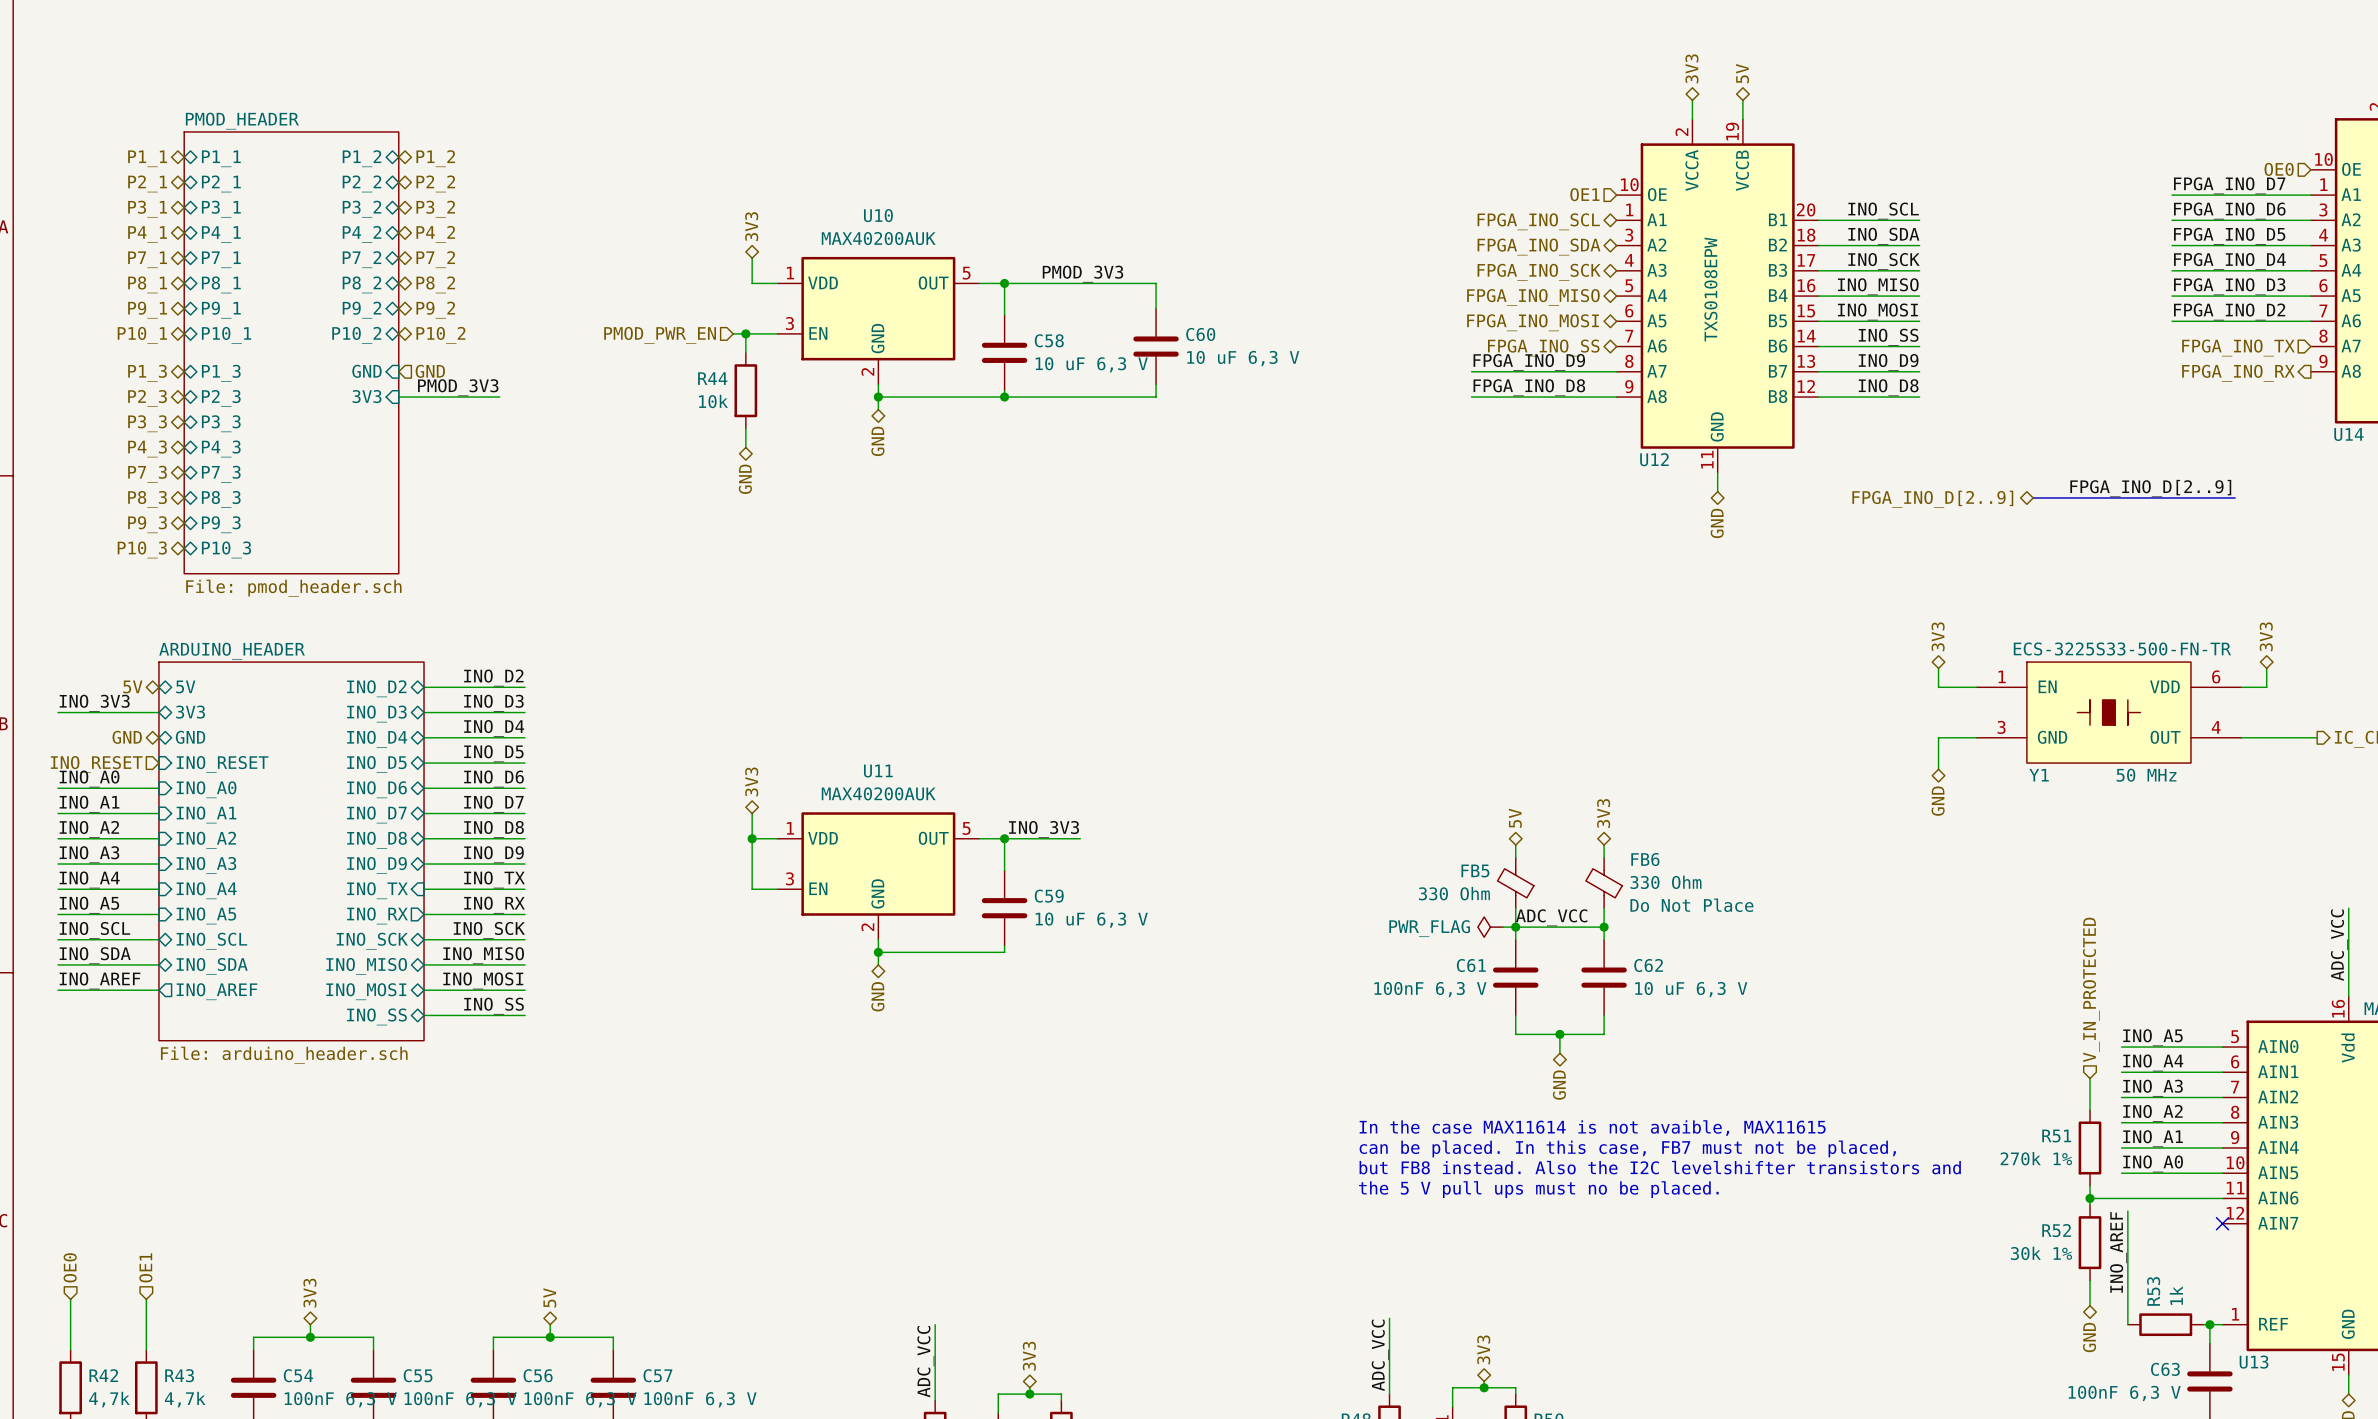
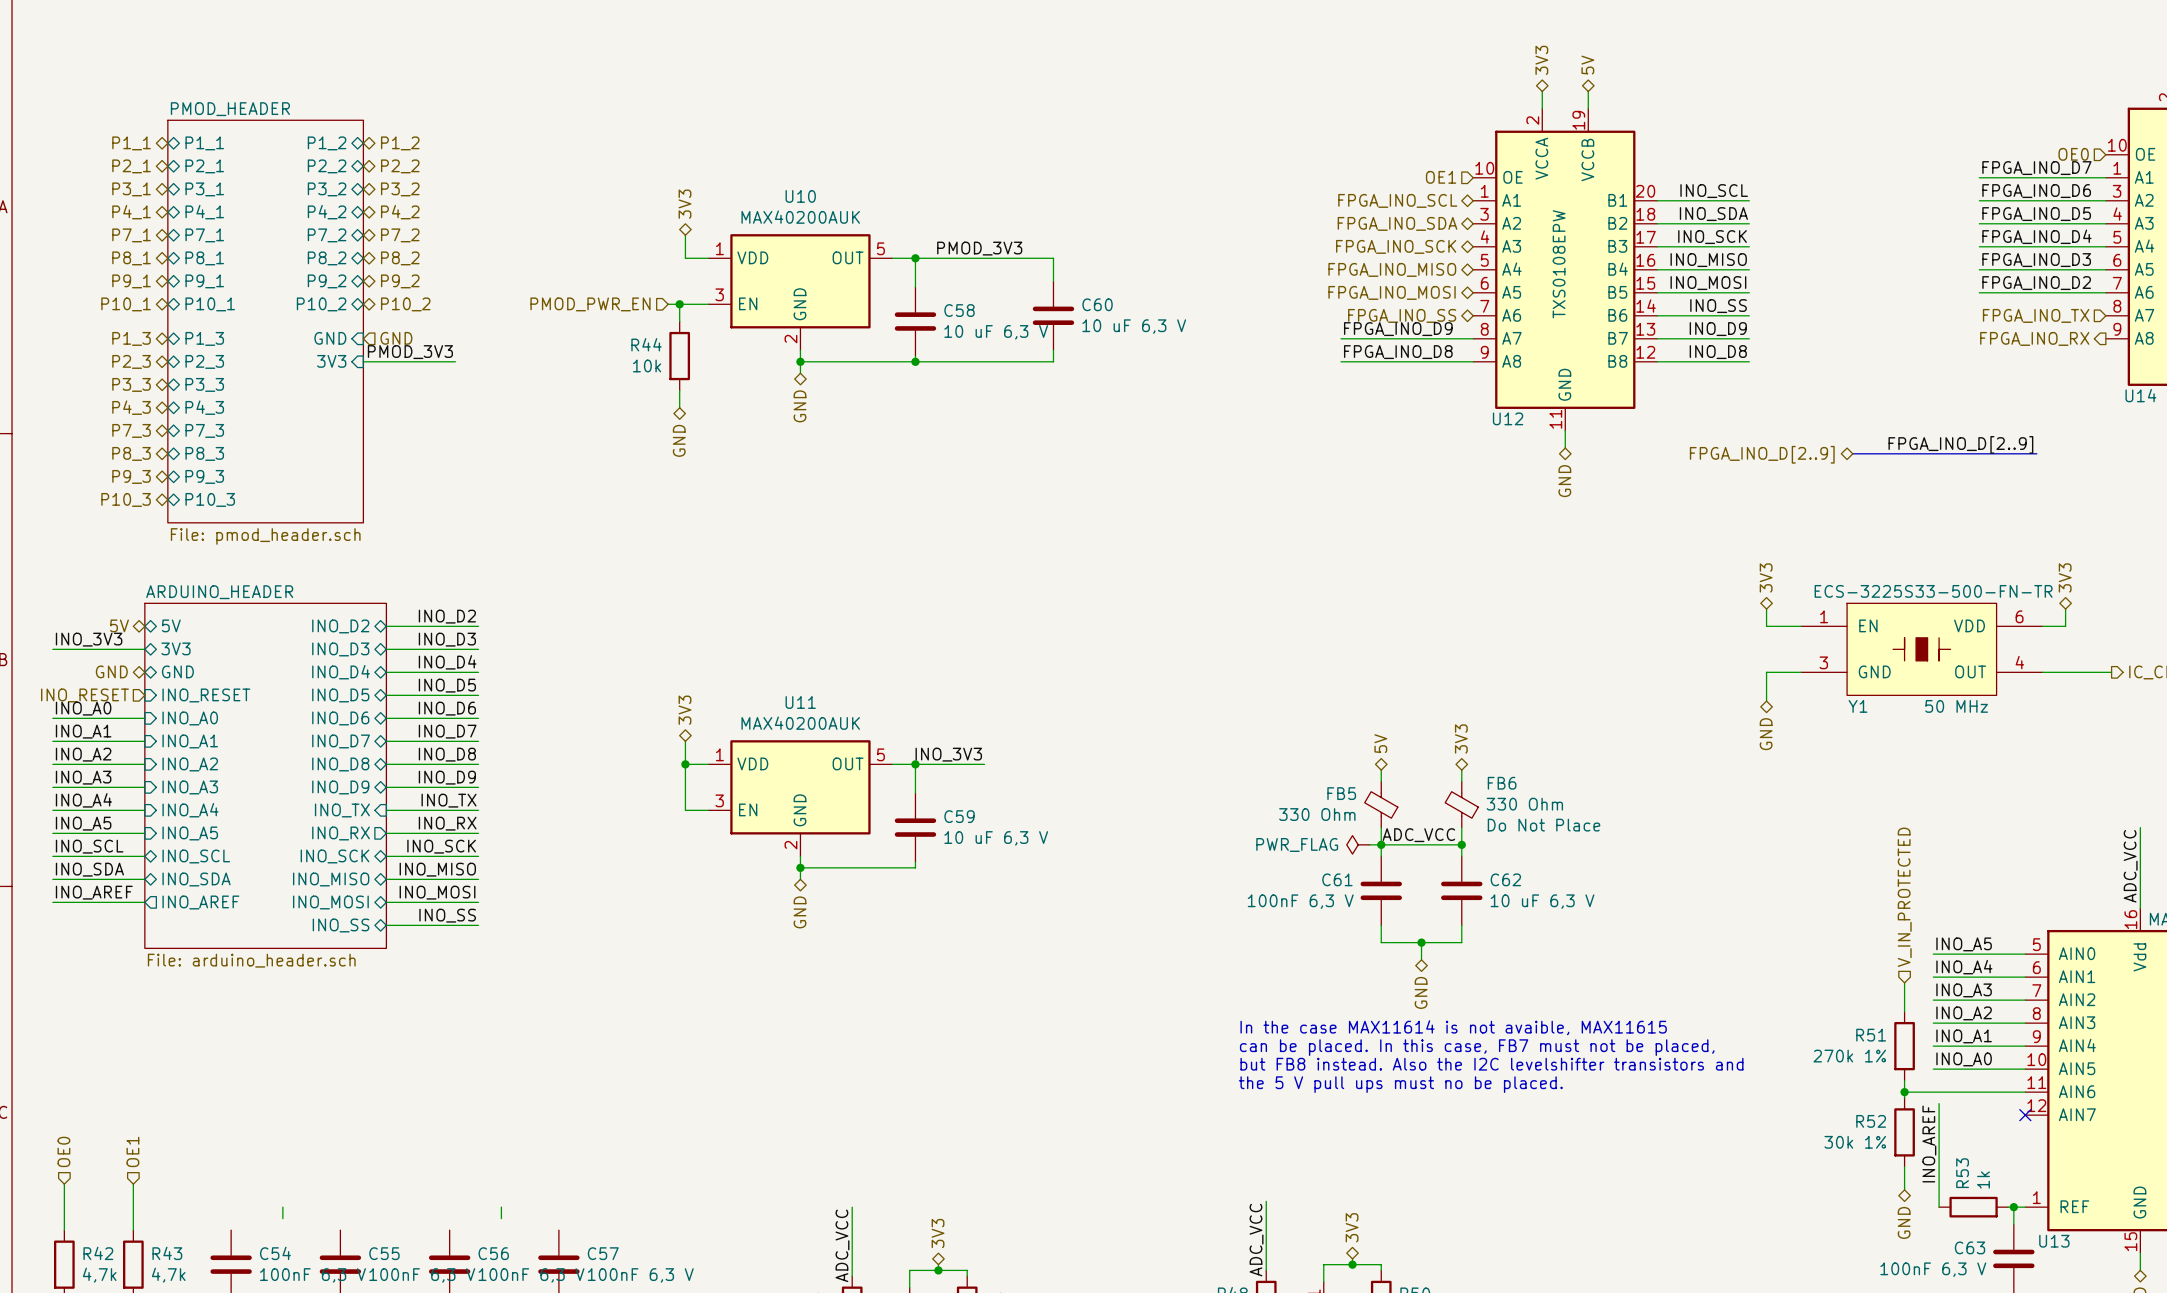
hierarchical label: 3V3 (309, 1293) -> none
hierarchical label: 5V (549, 1297) -> none
junction: (310, 1337) -> none
junction: (550, 1337) -> none
wire: (253, 1349) (253, 1337) (373, 1337) (373, 1349) -> none
wire: (493, 1349) (493, 1337) (613, 1337) (613, 1349) -> none

